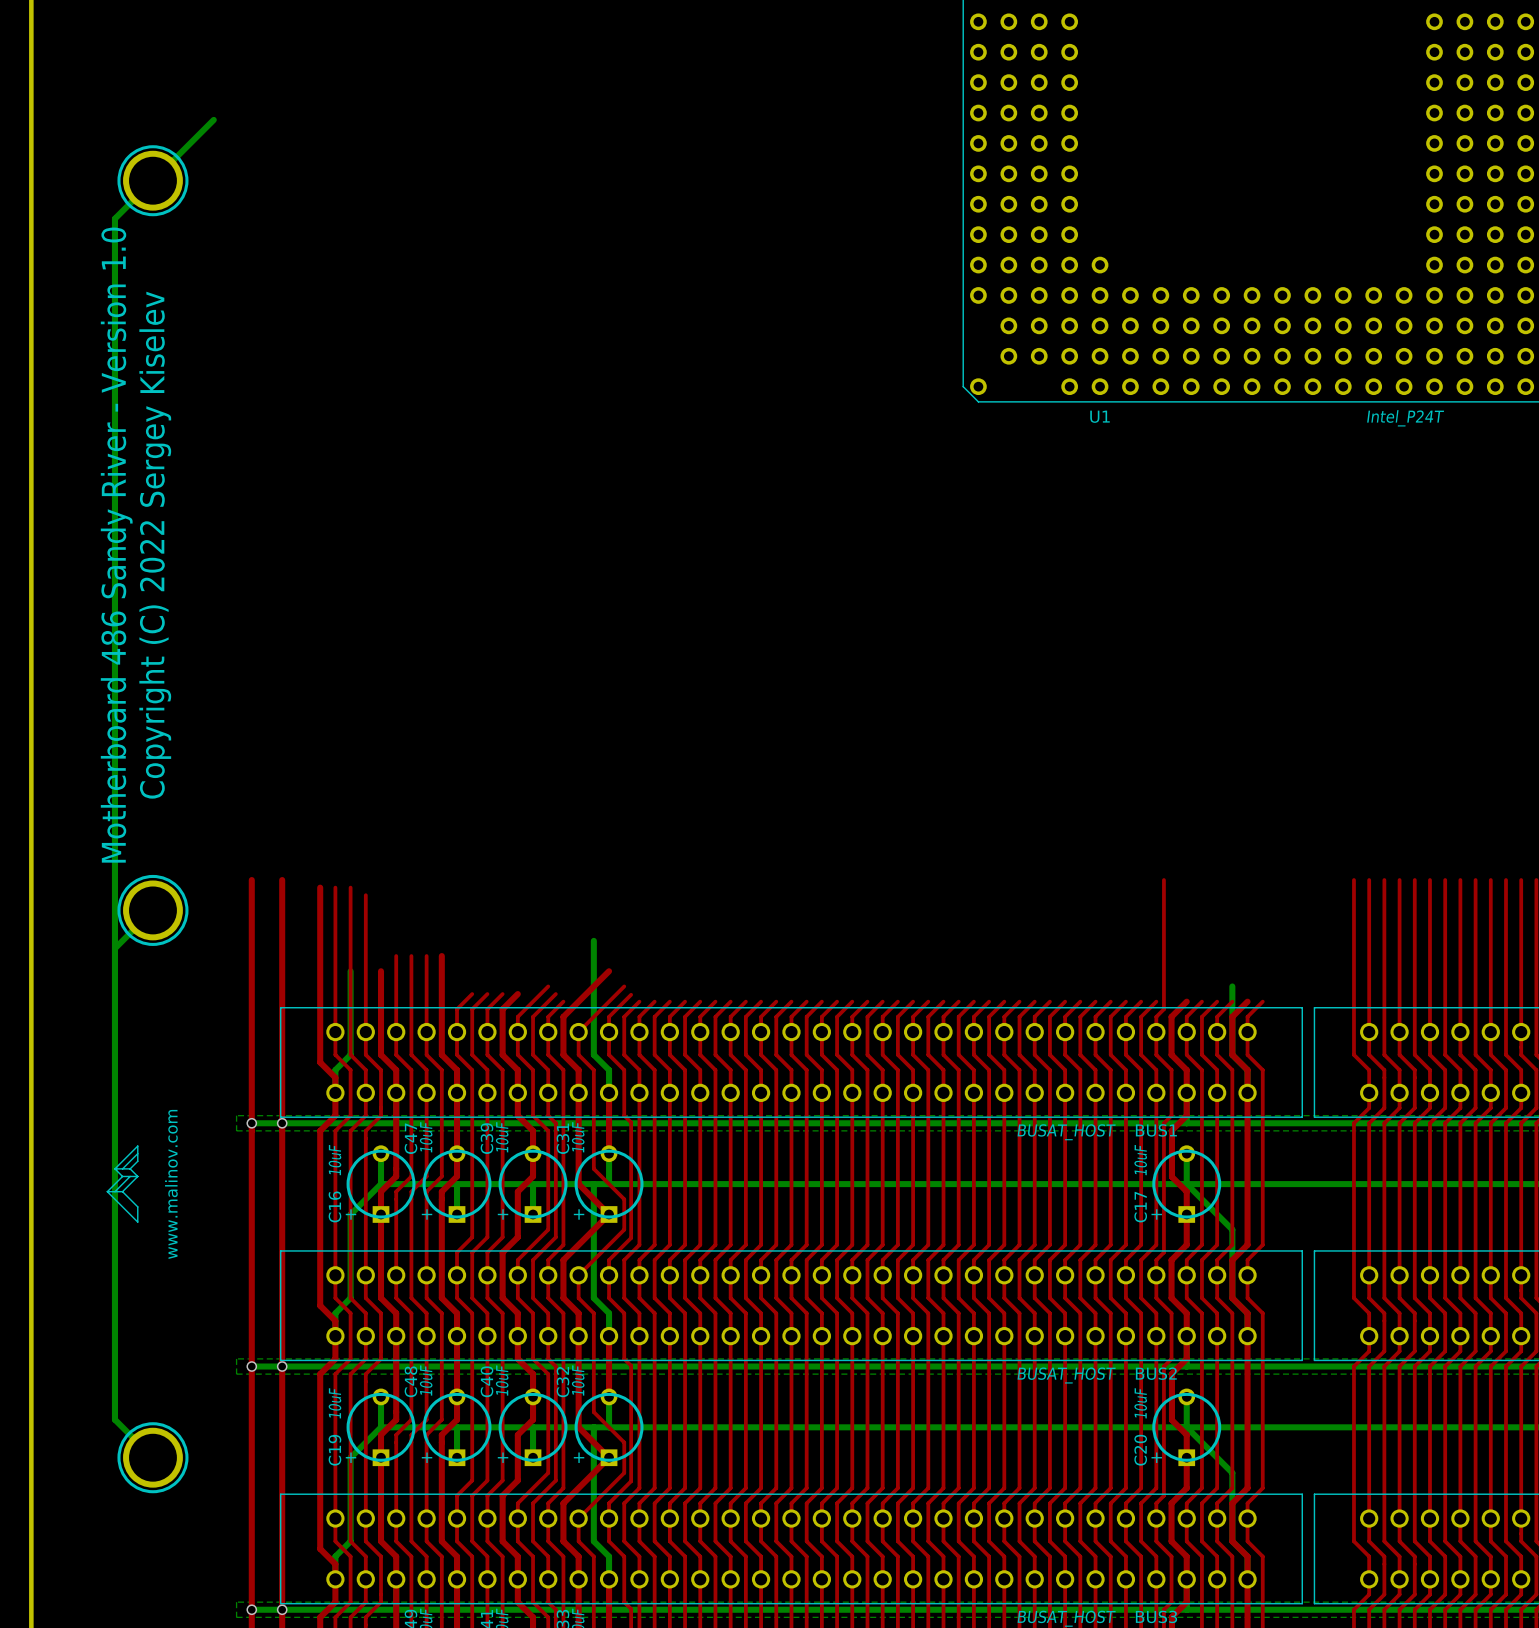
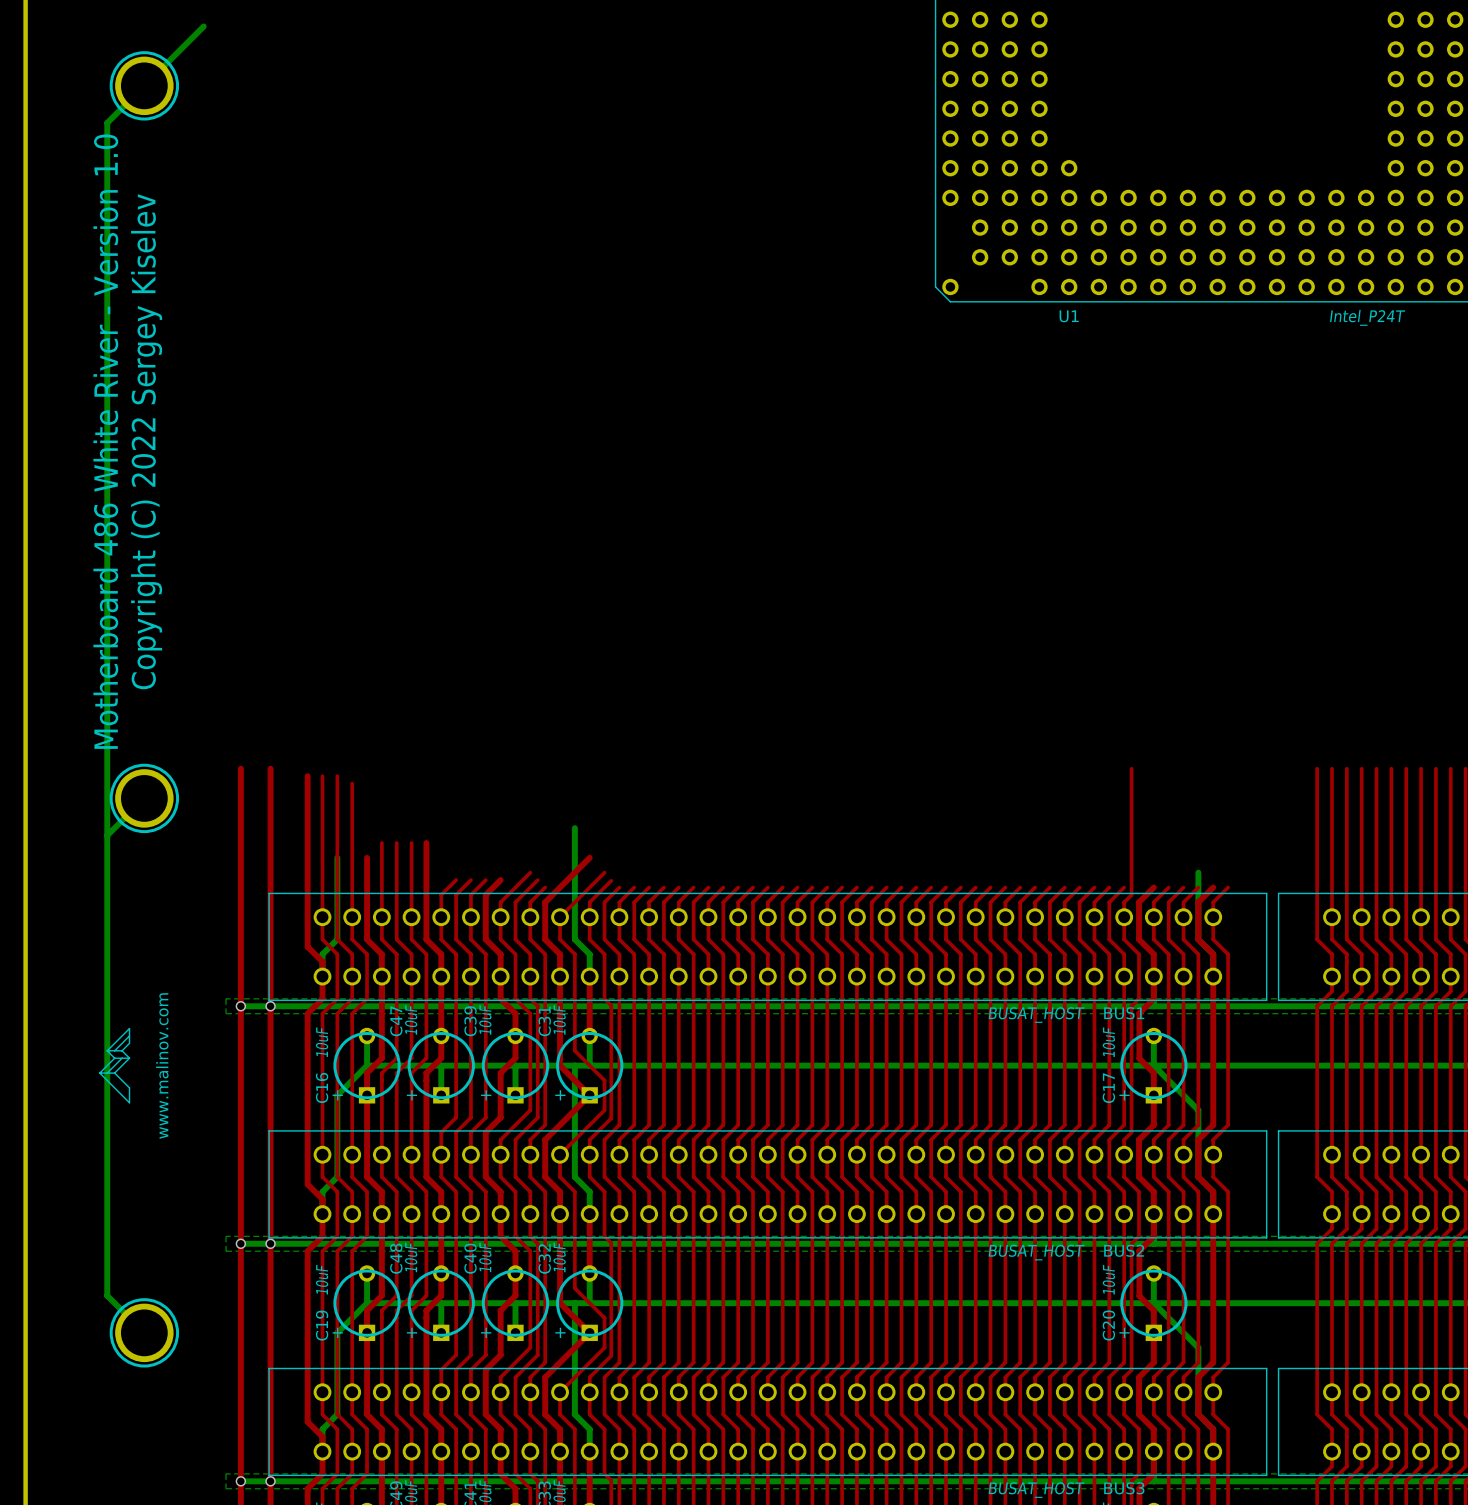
text: Motherboard 486 Sandy River - Version 1.0 (116, 545) -> Motherboard 486 White River - Version 1.0 (105, 441)

